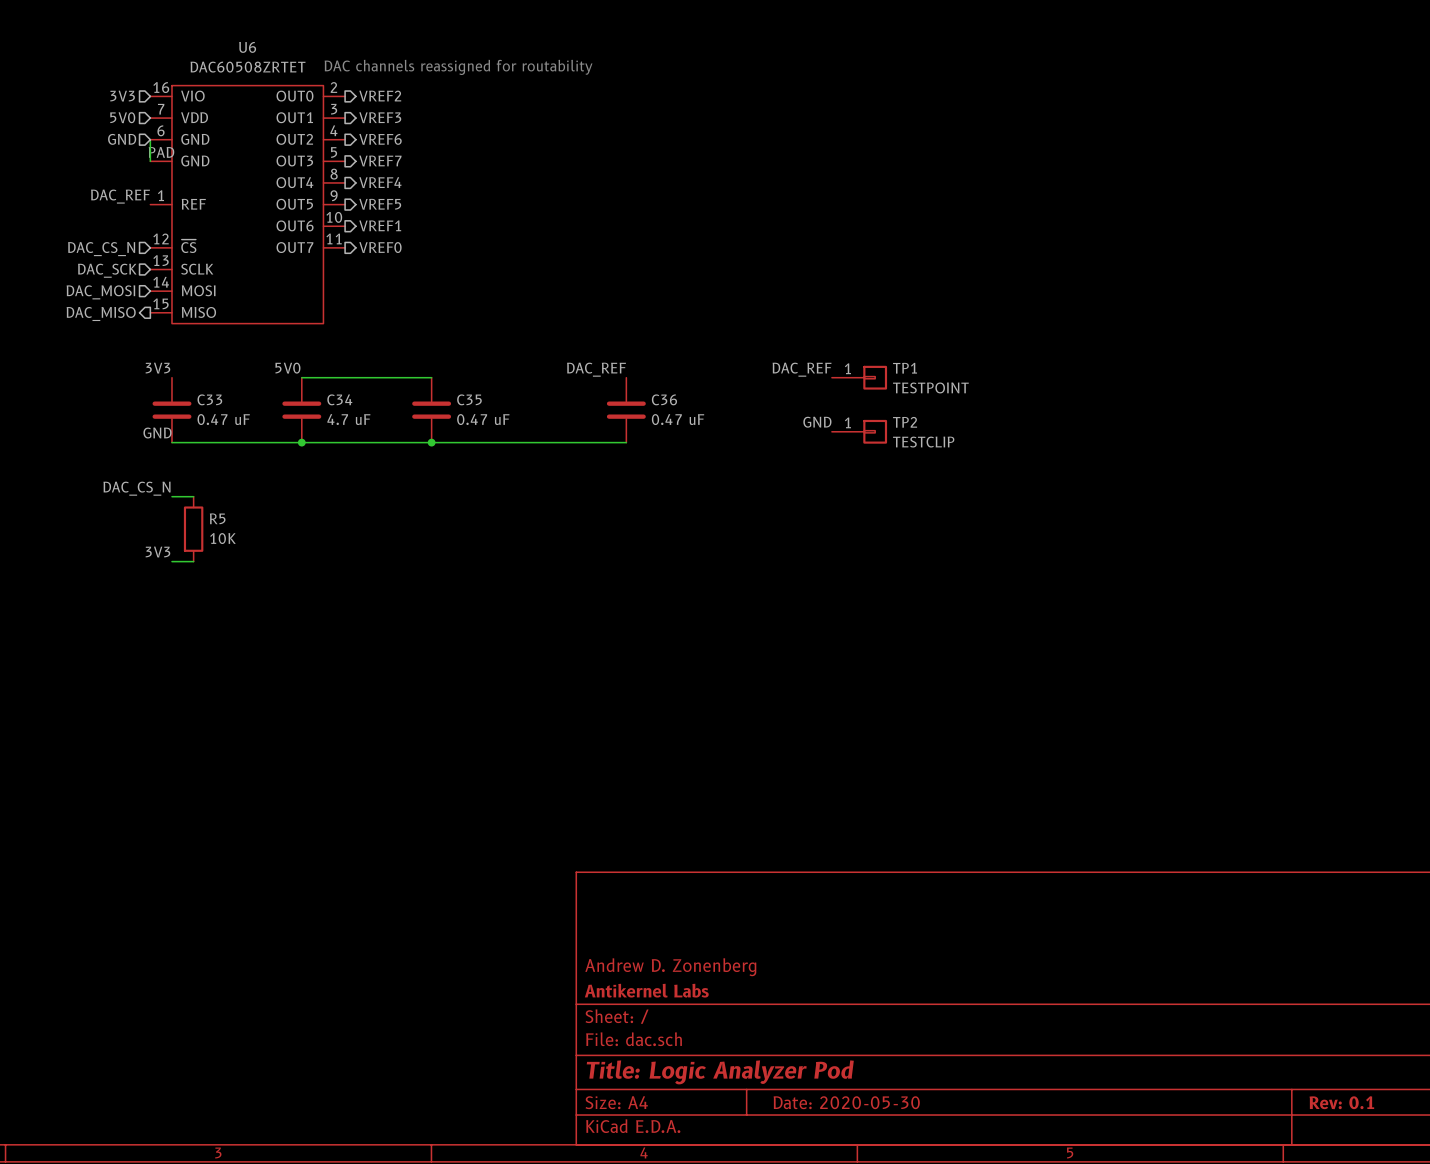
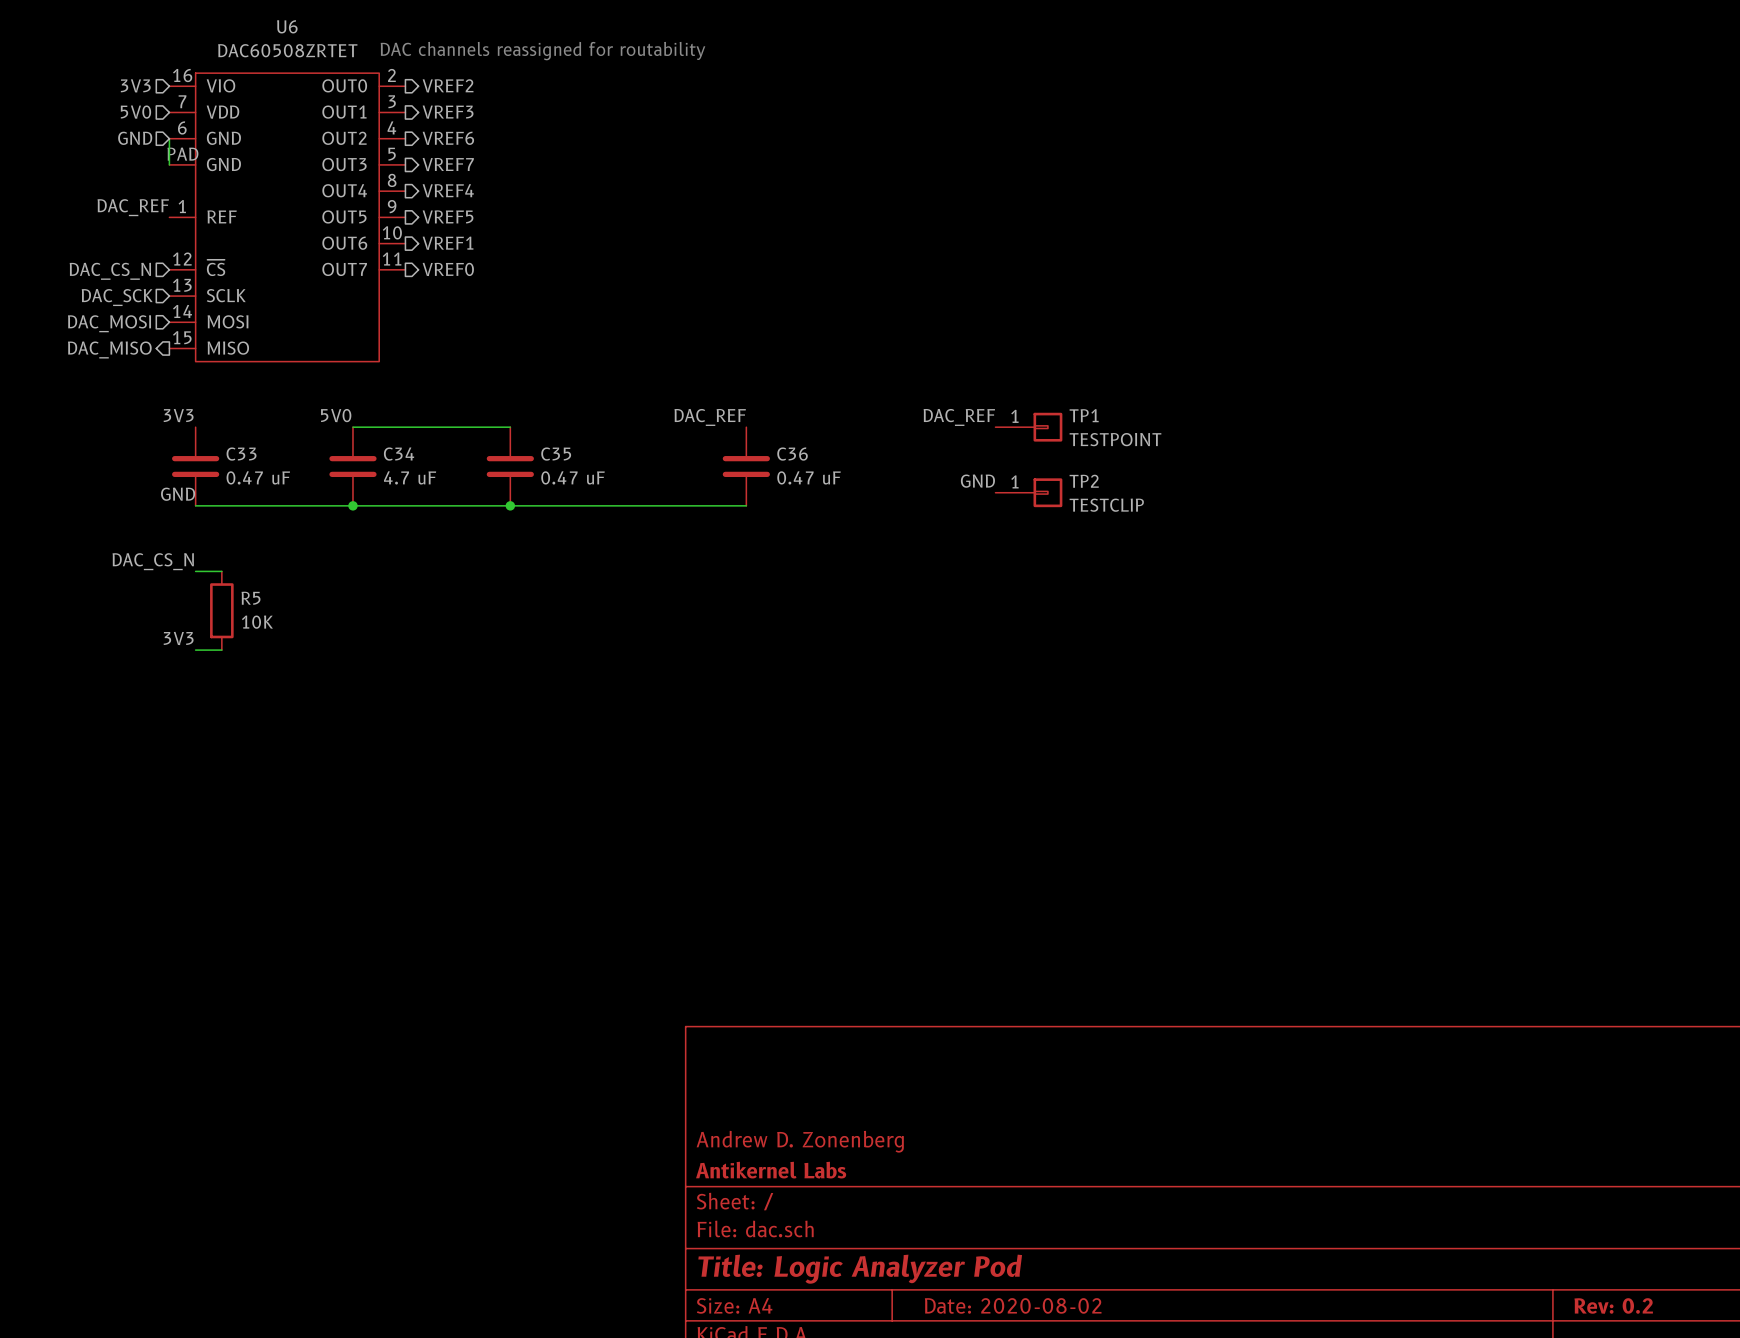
title block: Date: 2020-05-30 (846, 1102) -> Date: 2020-08-02 (1013, 1305)
title block: Rev: 0.1 (1341, 1102) -> Rev: 0.2 (1613, 1305)

